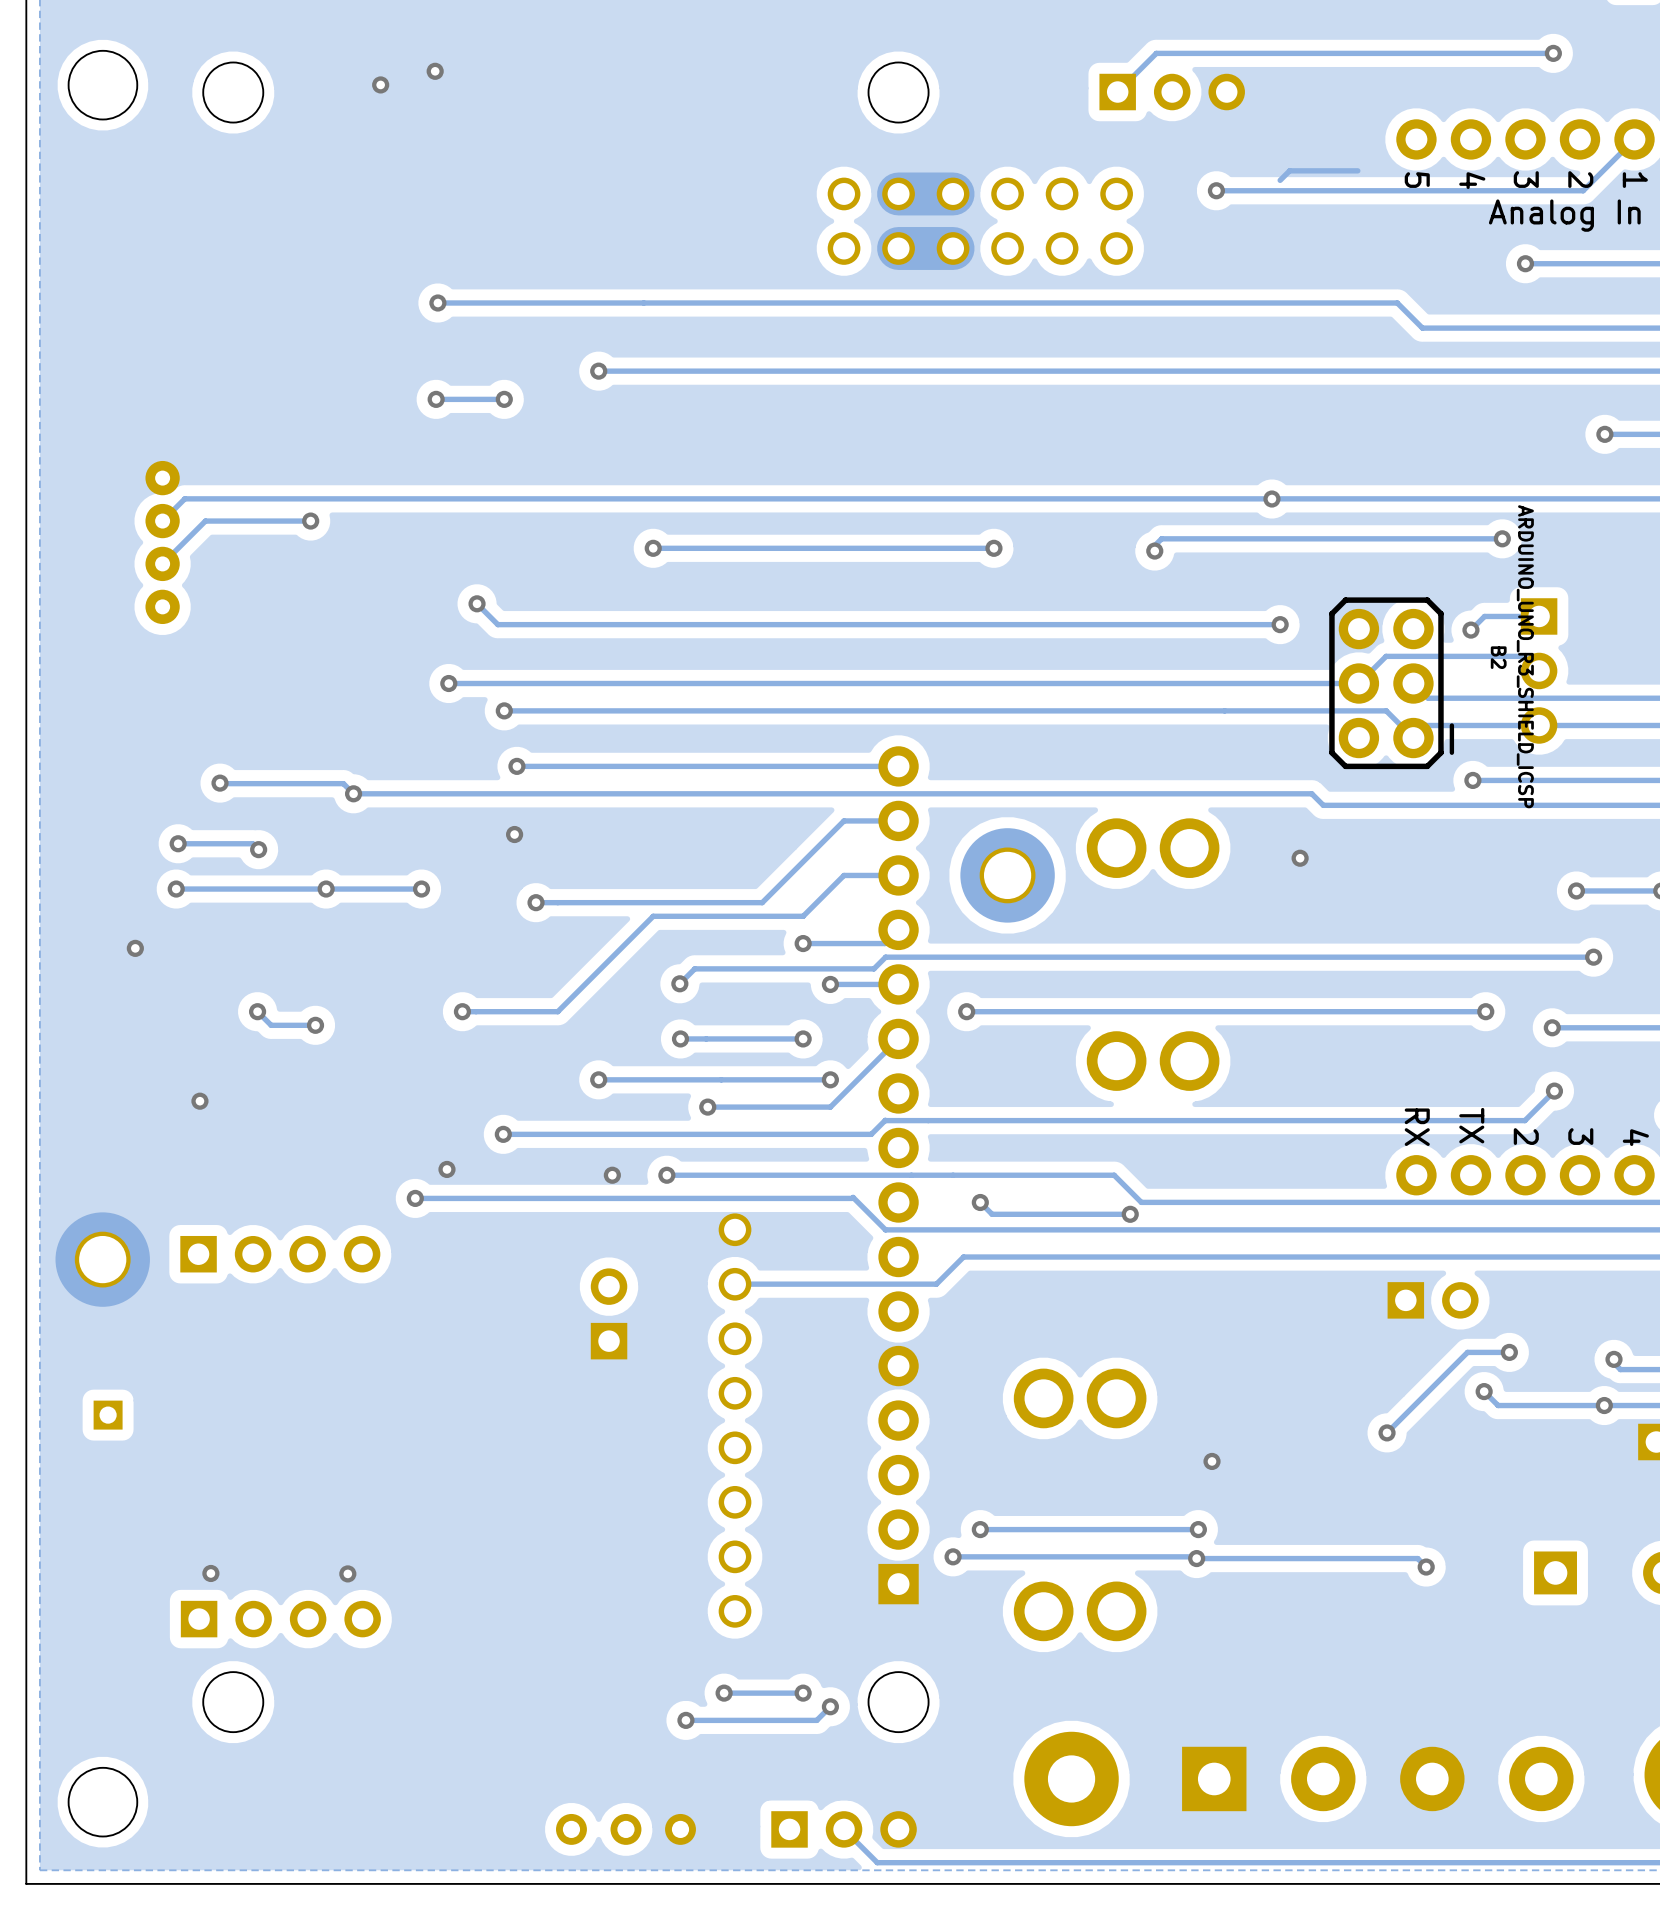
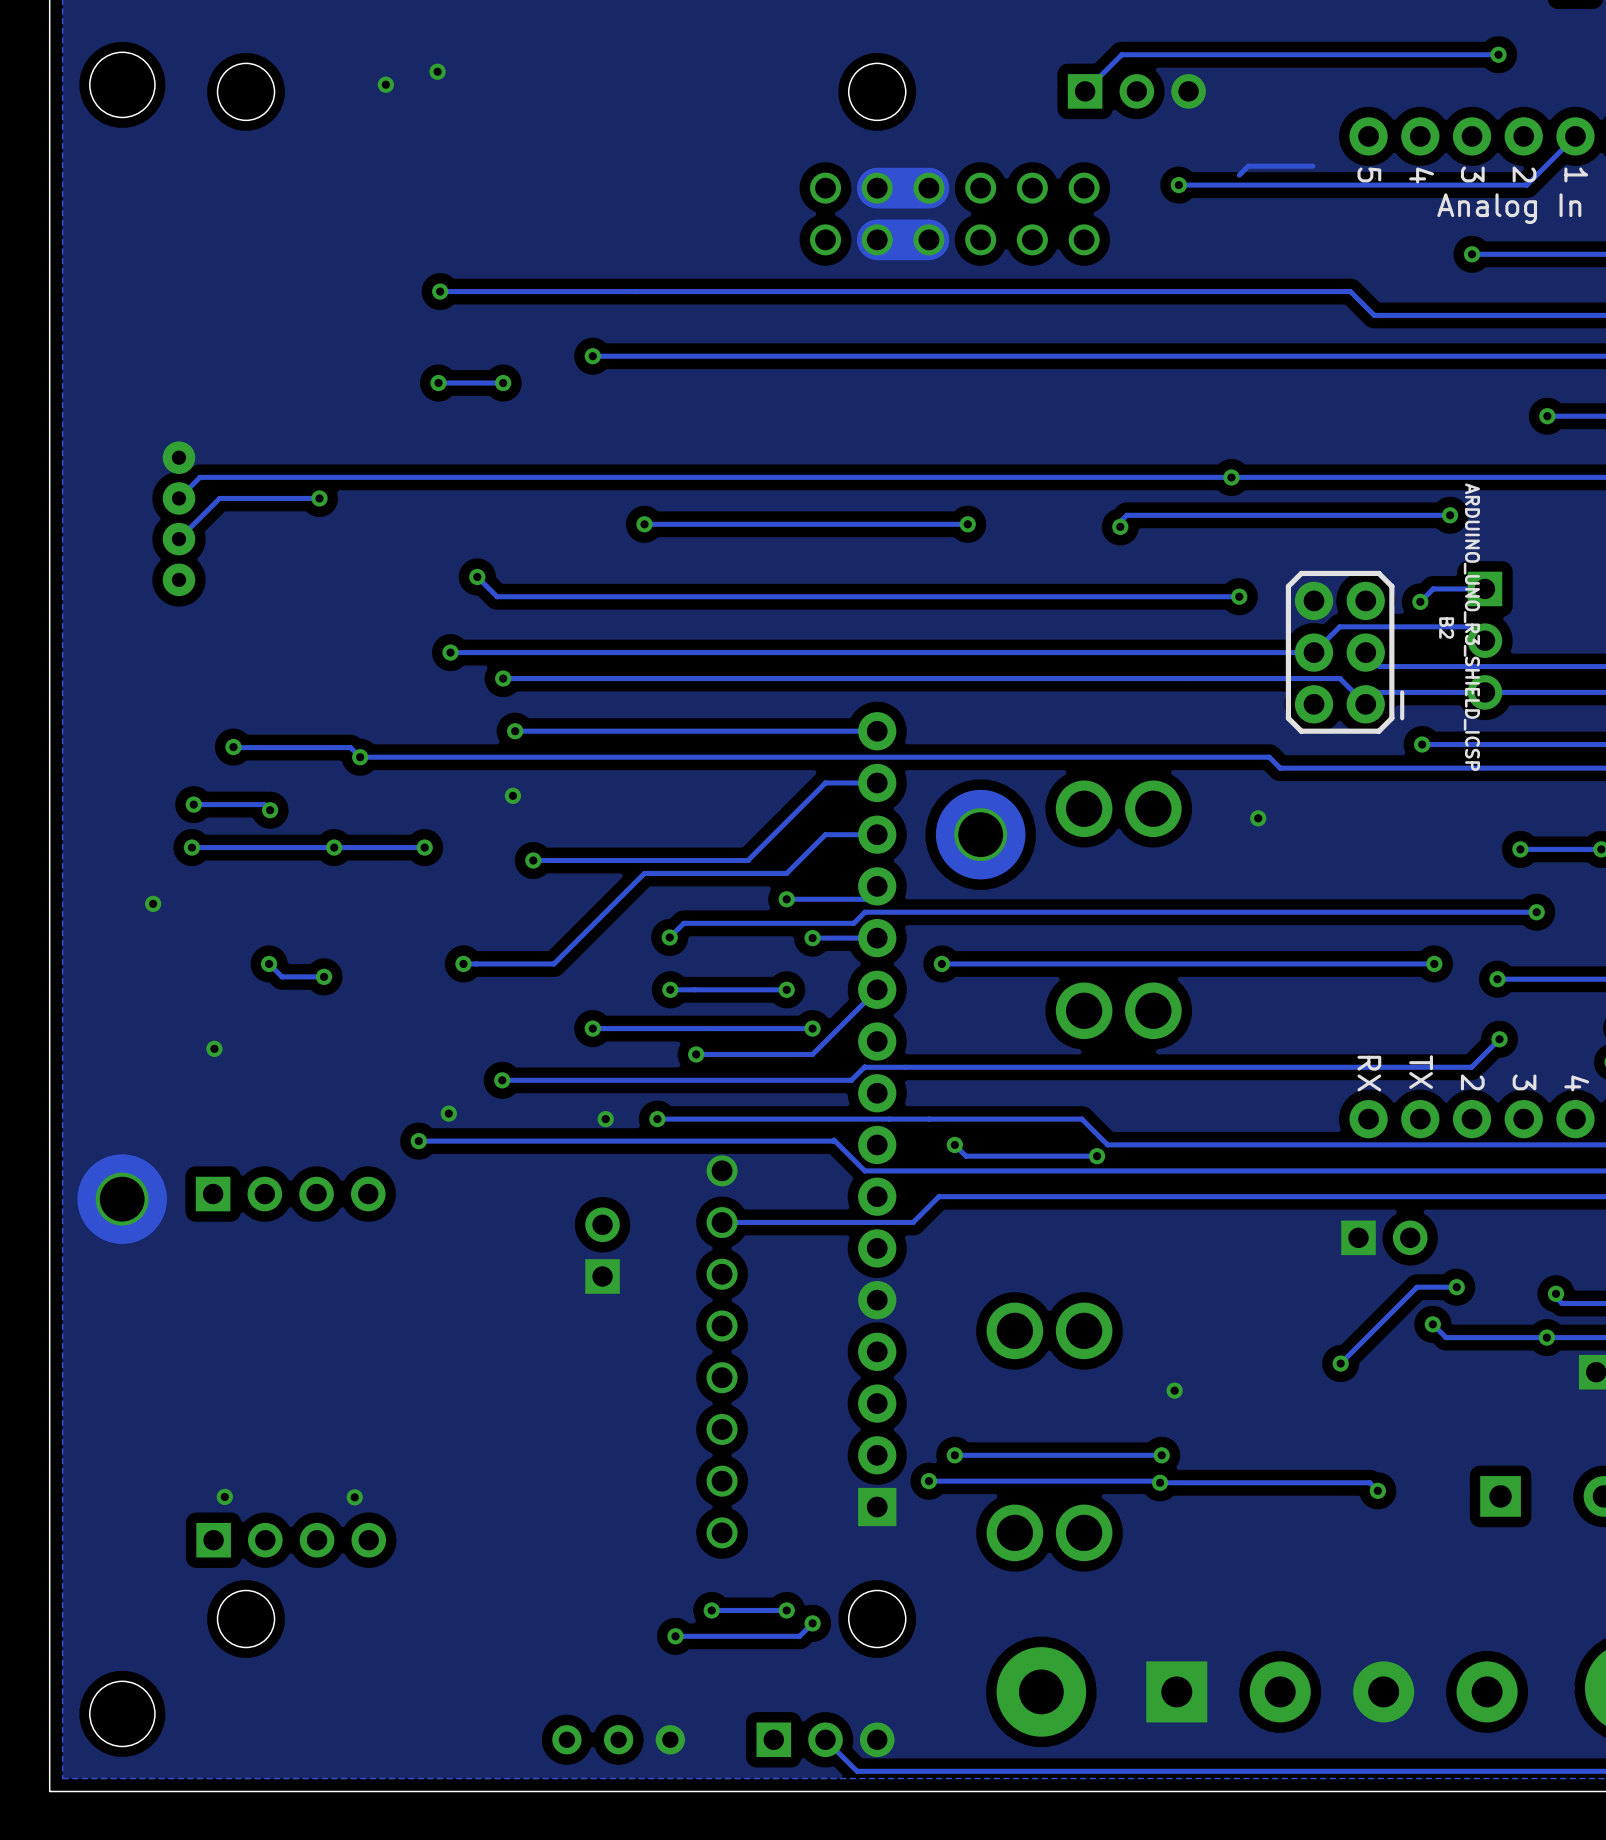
part: (108, 1415) -> none

